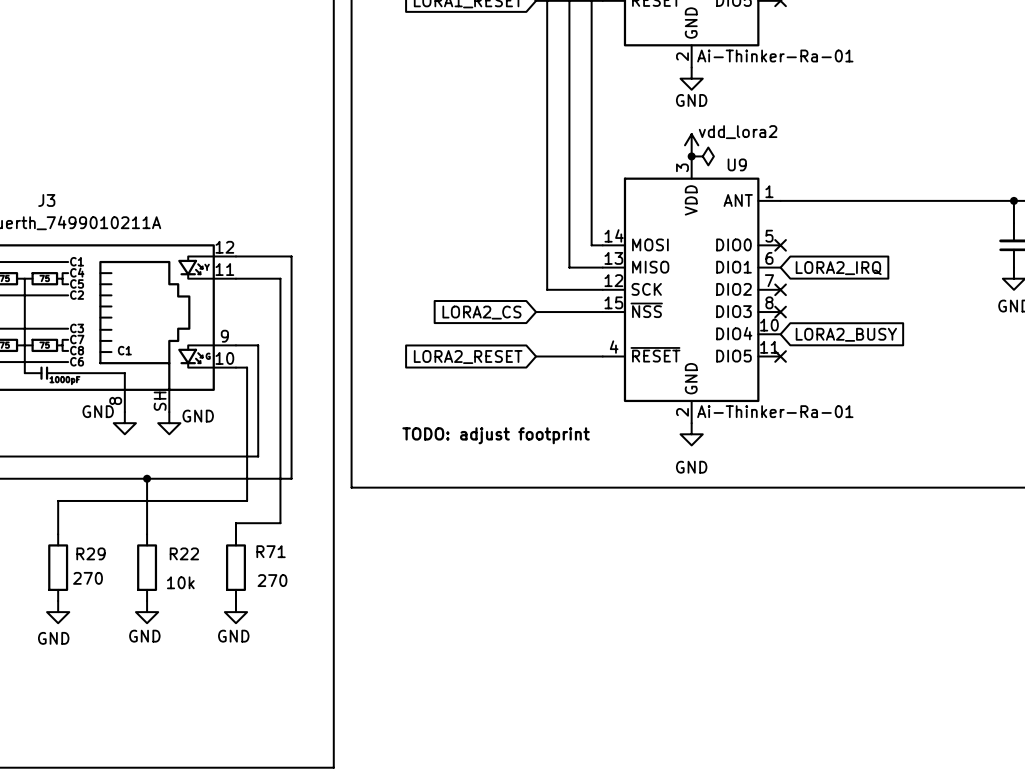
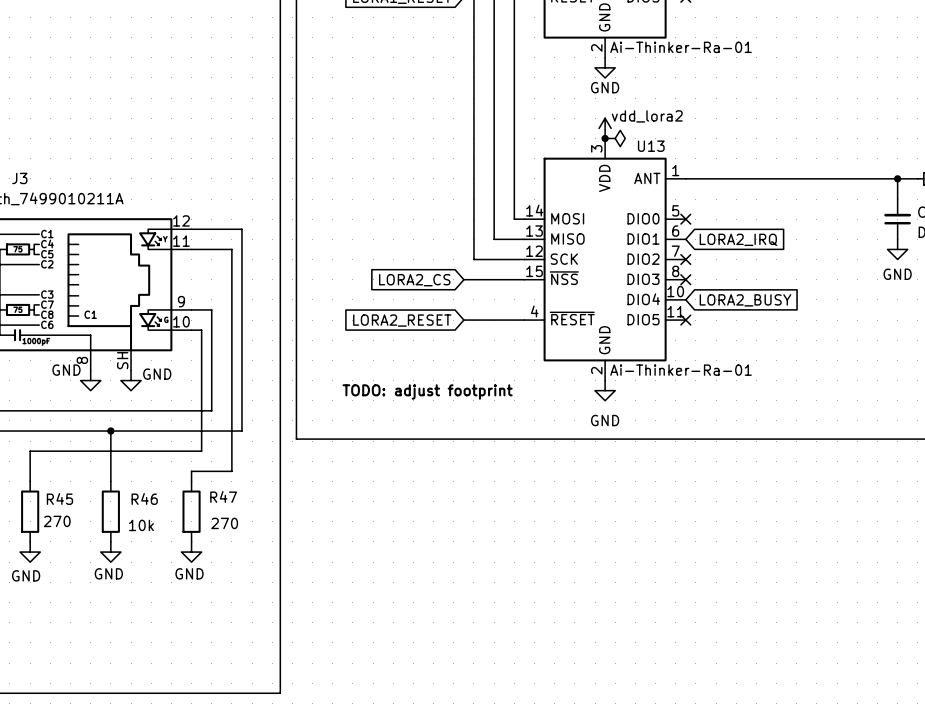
U9 name: U9 (737, 164) -> U13 (651, 146)
R71 name: R71 (271, 551) -> R47 (223, 496)
R29 name: R29 (91, 553) -> R45 (59, 498)
R22 name: R22 (184, 553) -> R46 (144, 498)

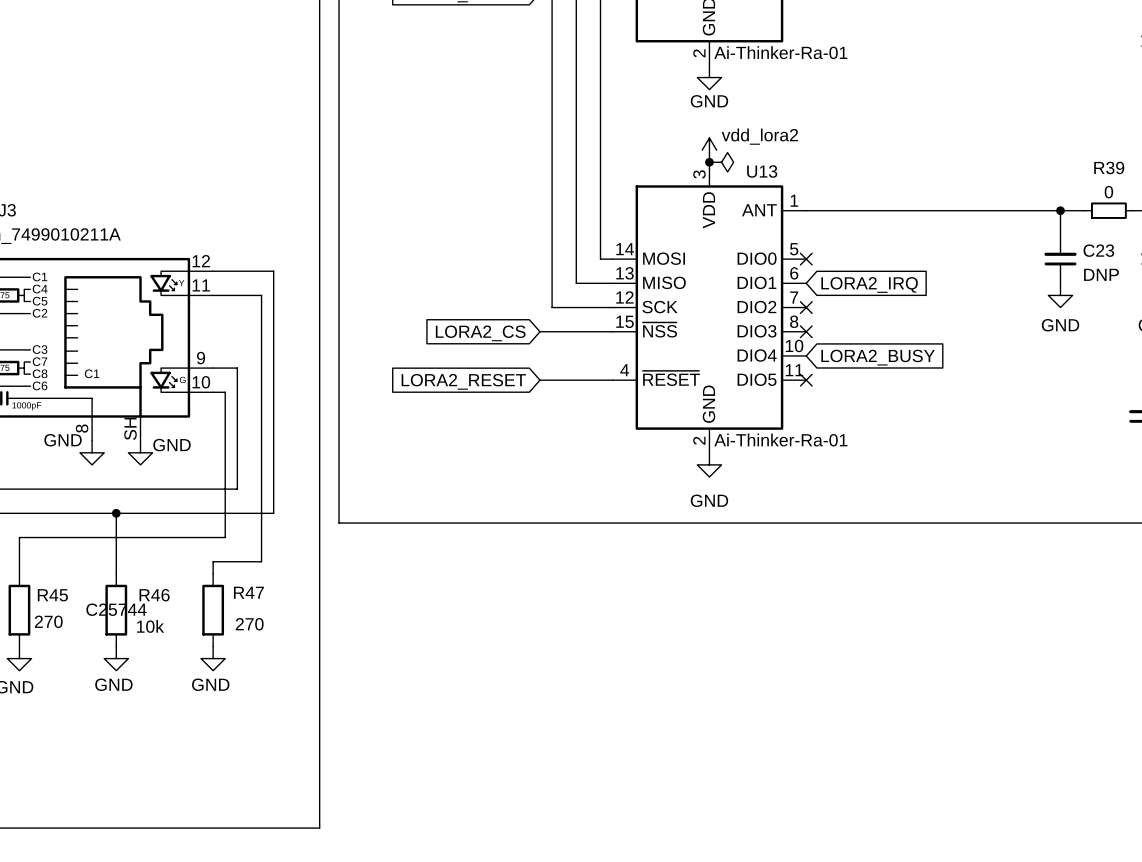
text: TODO: adjust footprint (427, 391) -> none
R46 text: none -> C25744 (116, 609)

